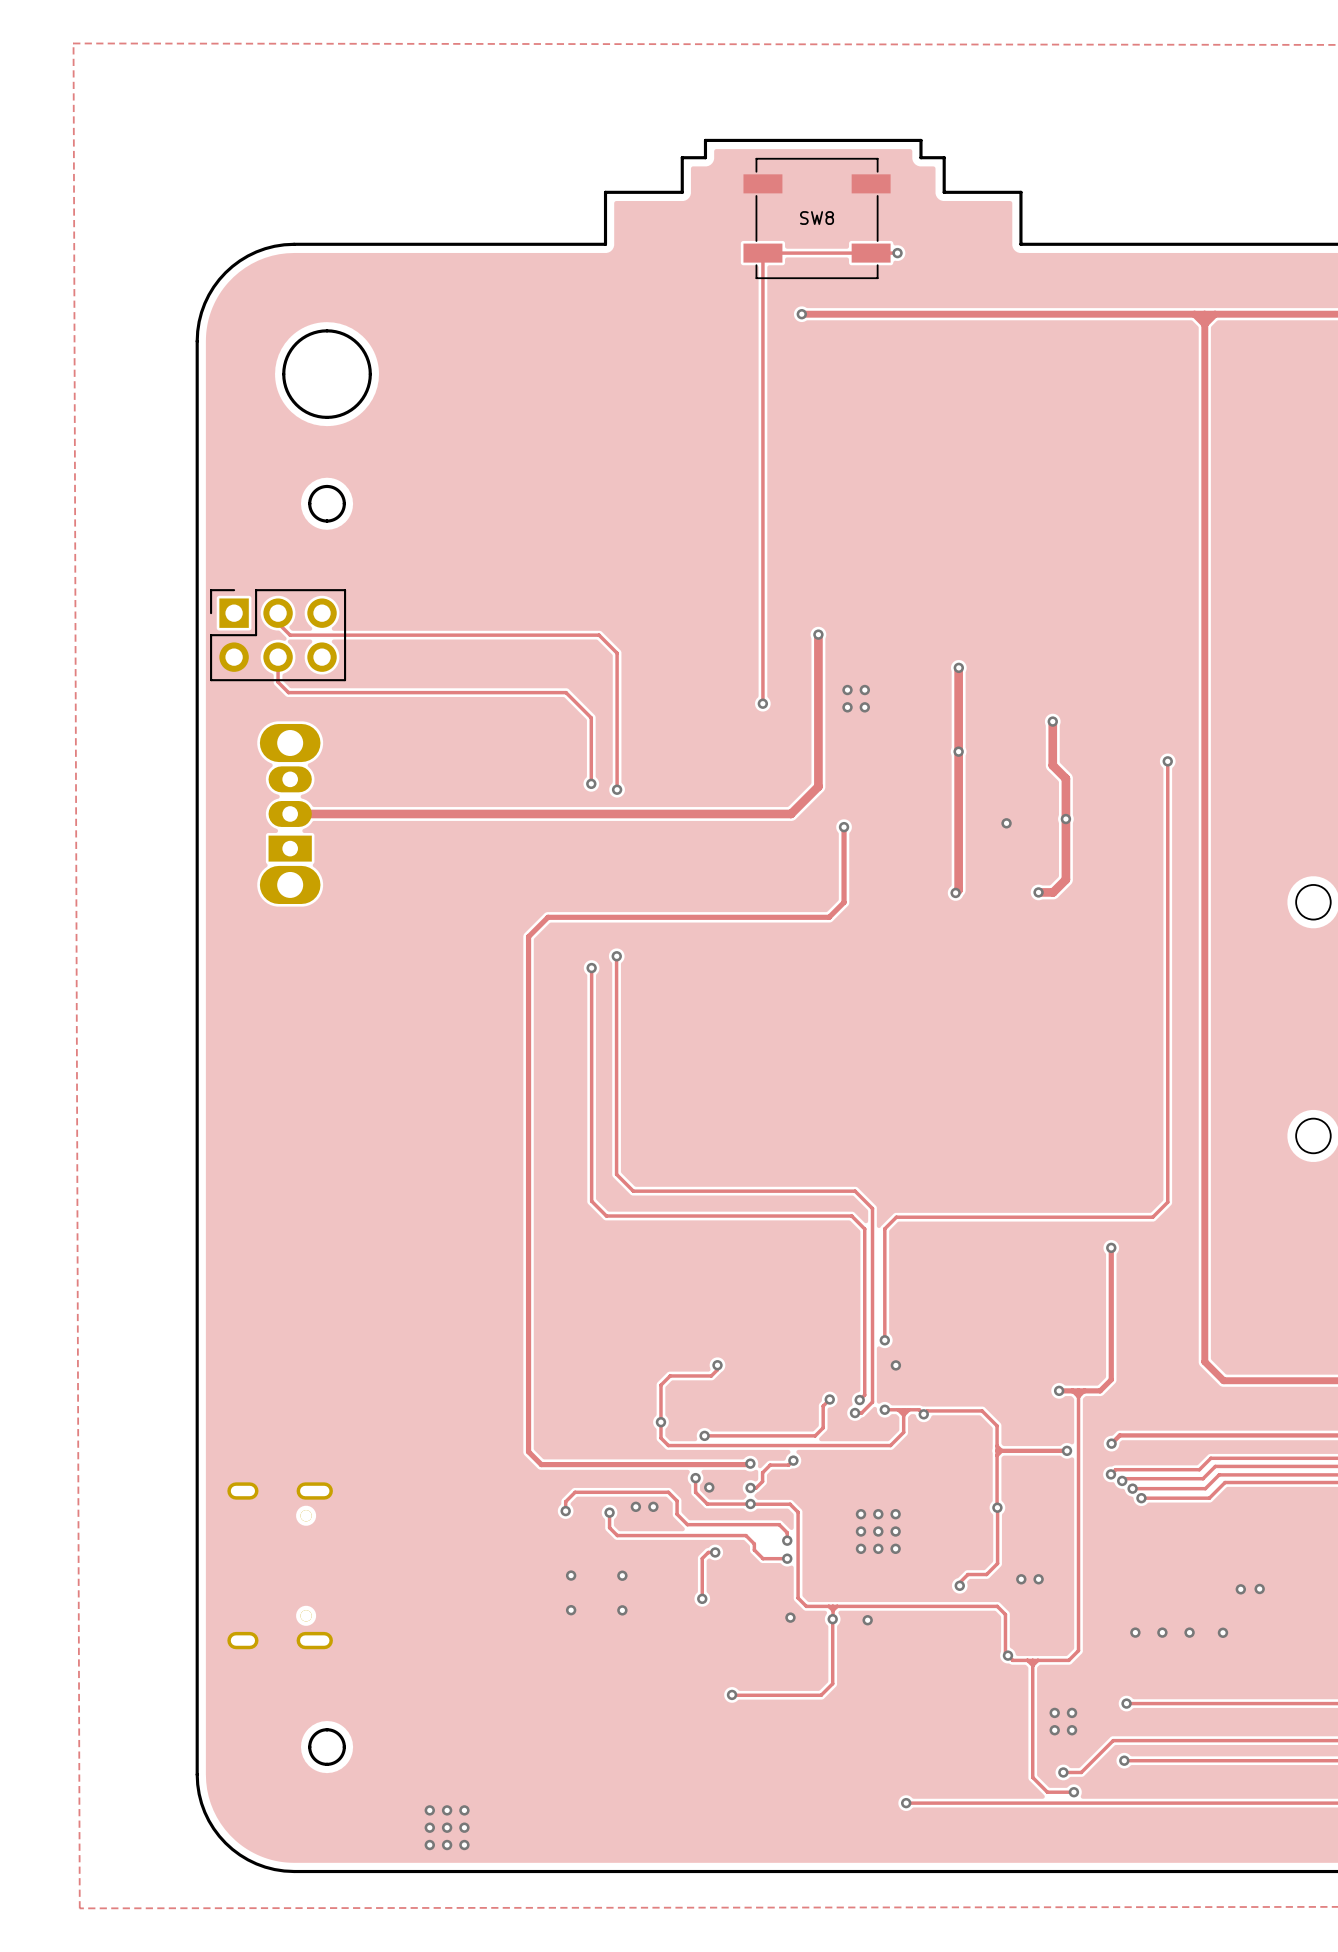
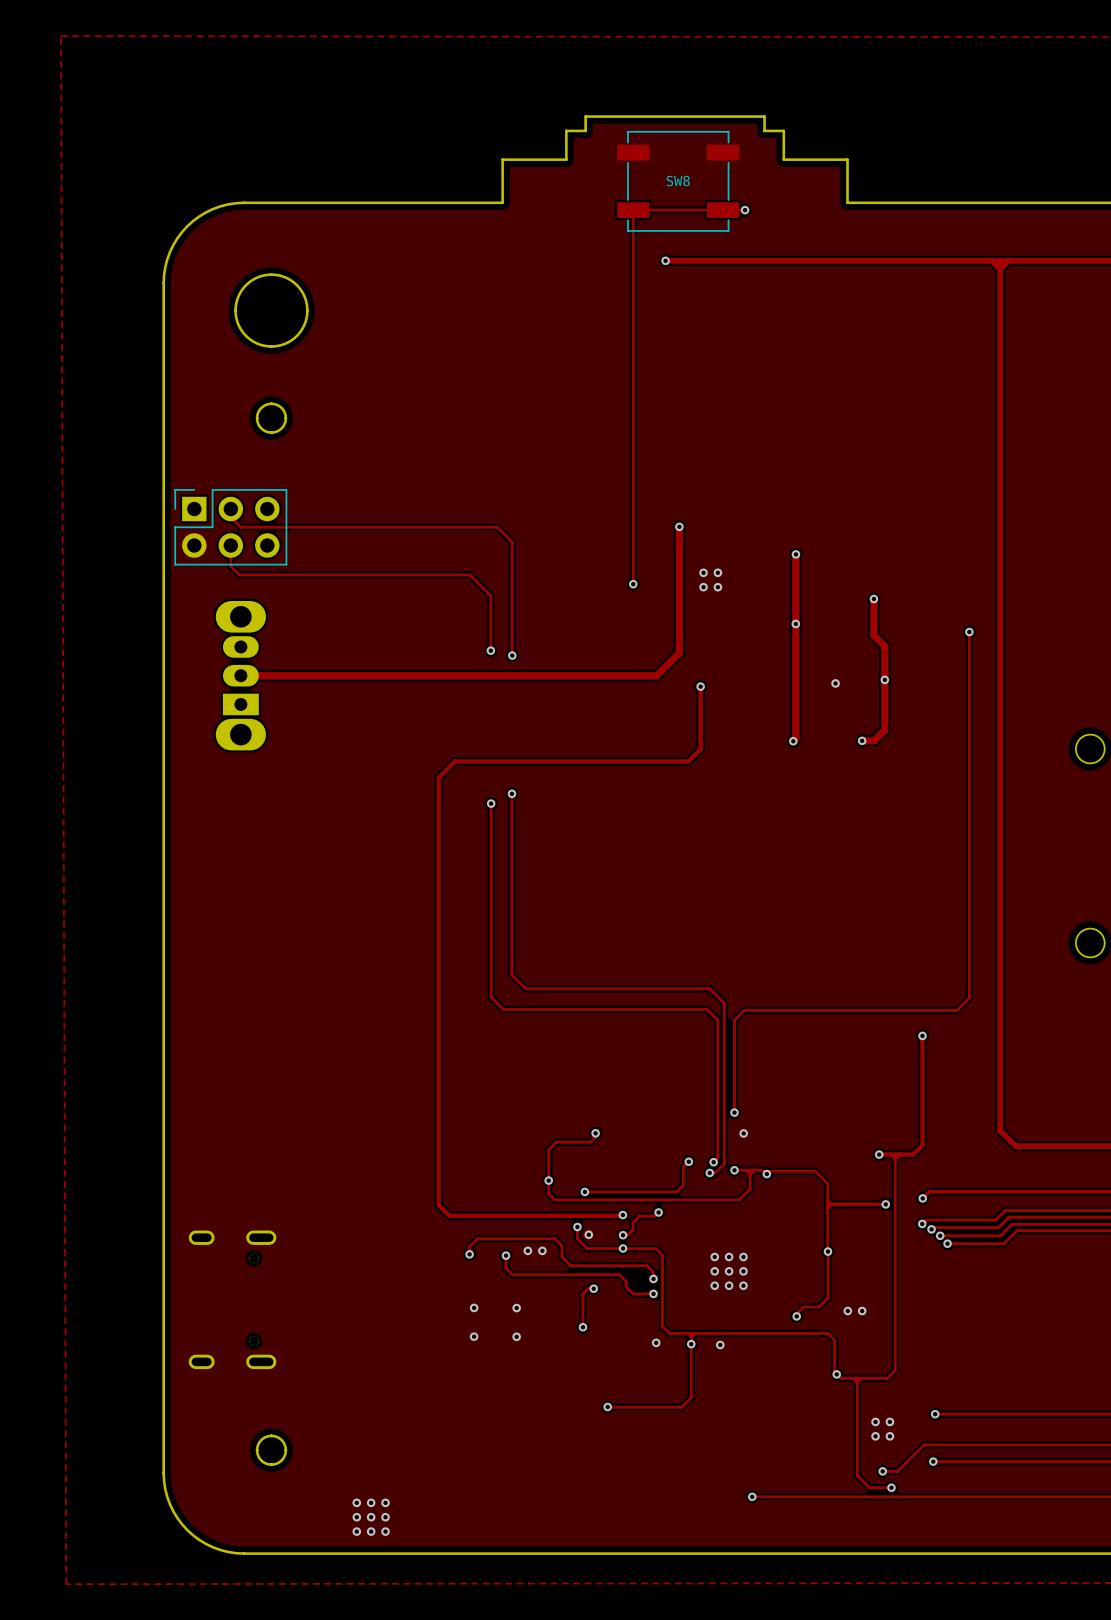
via: (1259, 1588) -> none
via: (1240, 1589) -> none
via: (1135, 1632) -> none
via: (1162, 1632) -> none
via: (1189, 1632) -> none
via: (1222, 1632) -> none

